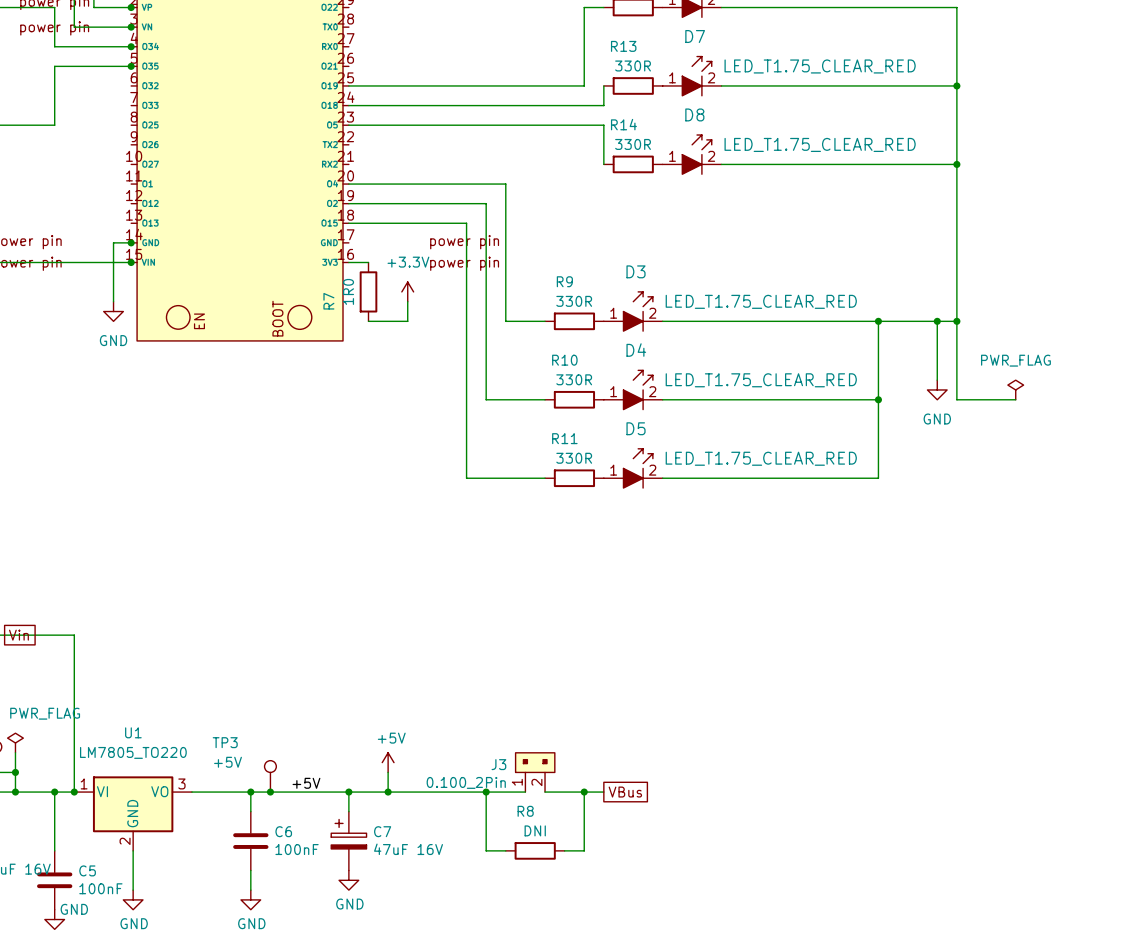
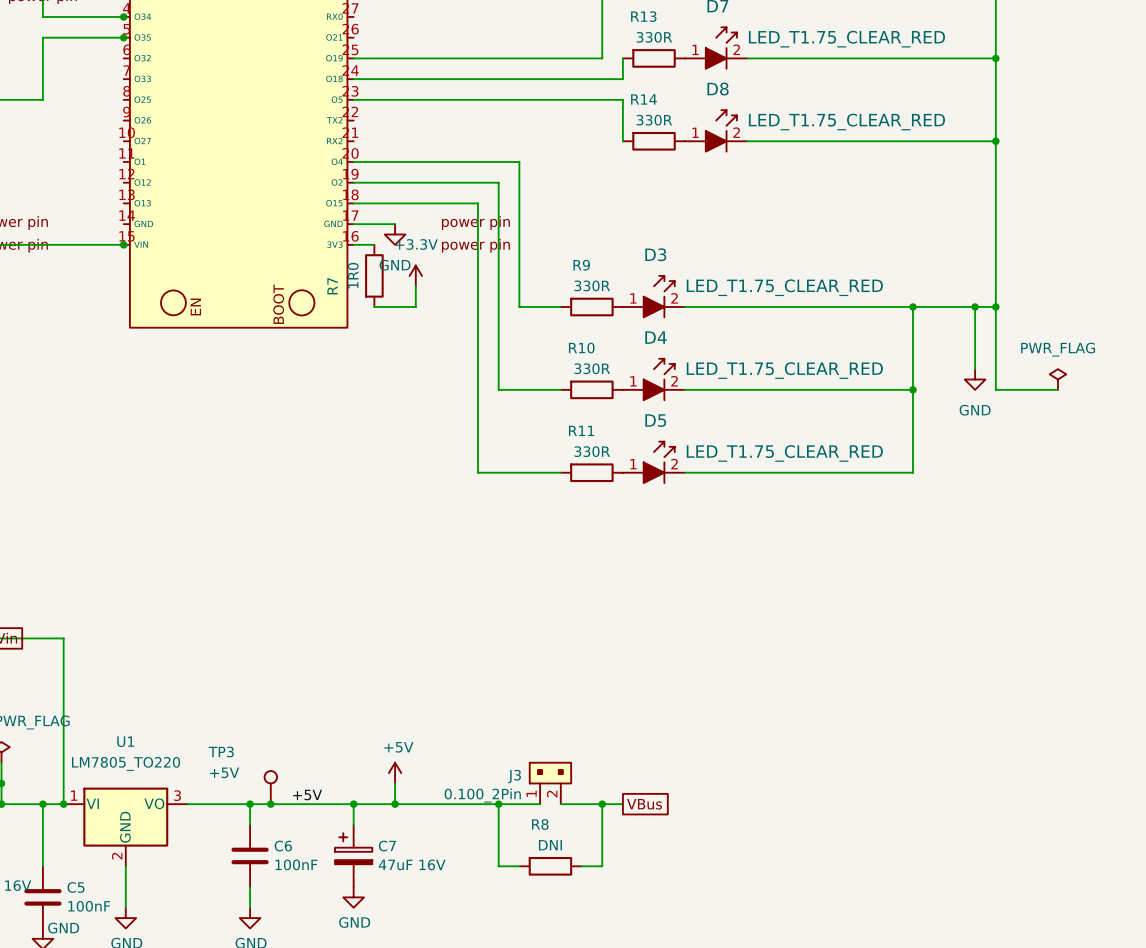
junction: (131, 242) -> none
wire: (133, 242) (113, 242) (113, 301) -> none
wire: none -> (353, 224) (395, 224)
power symbol: none -> GND (395, 234)
power symbol: GND (113, 311) -> none

